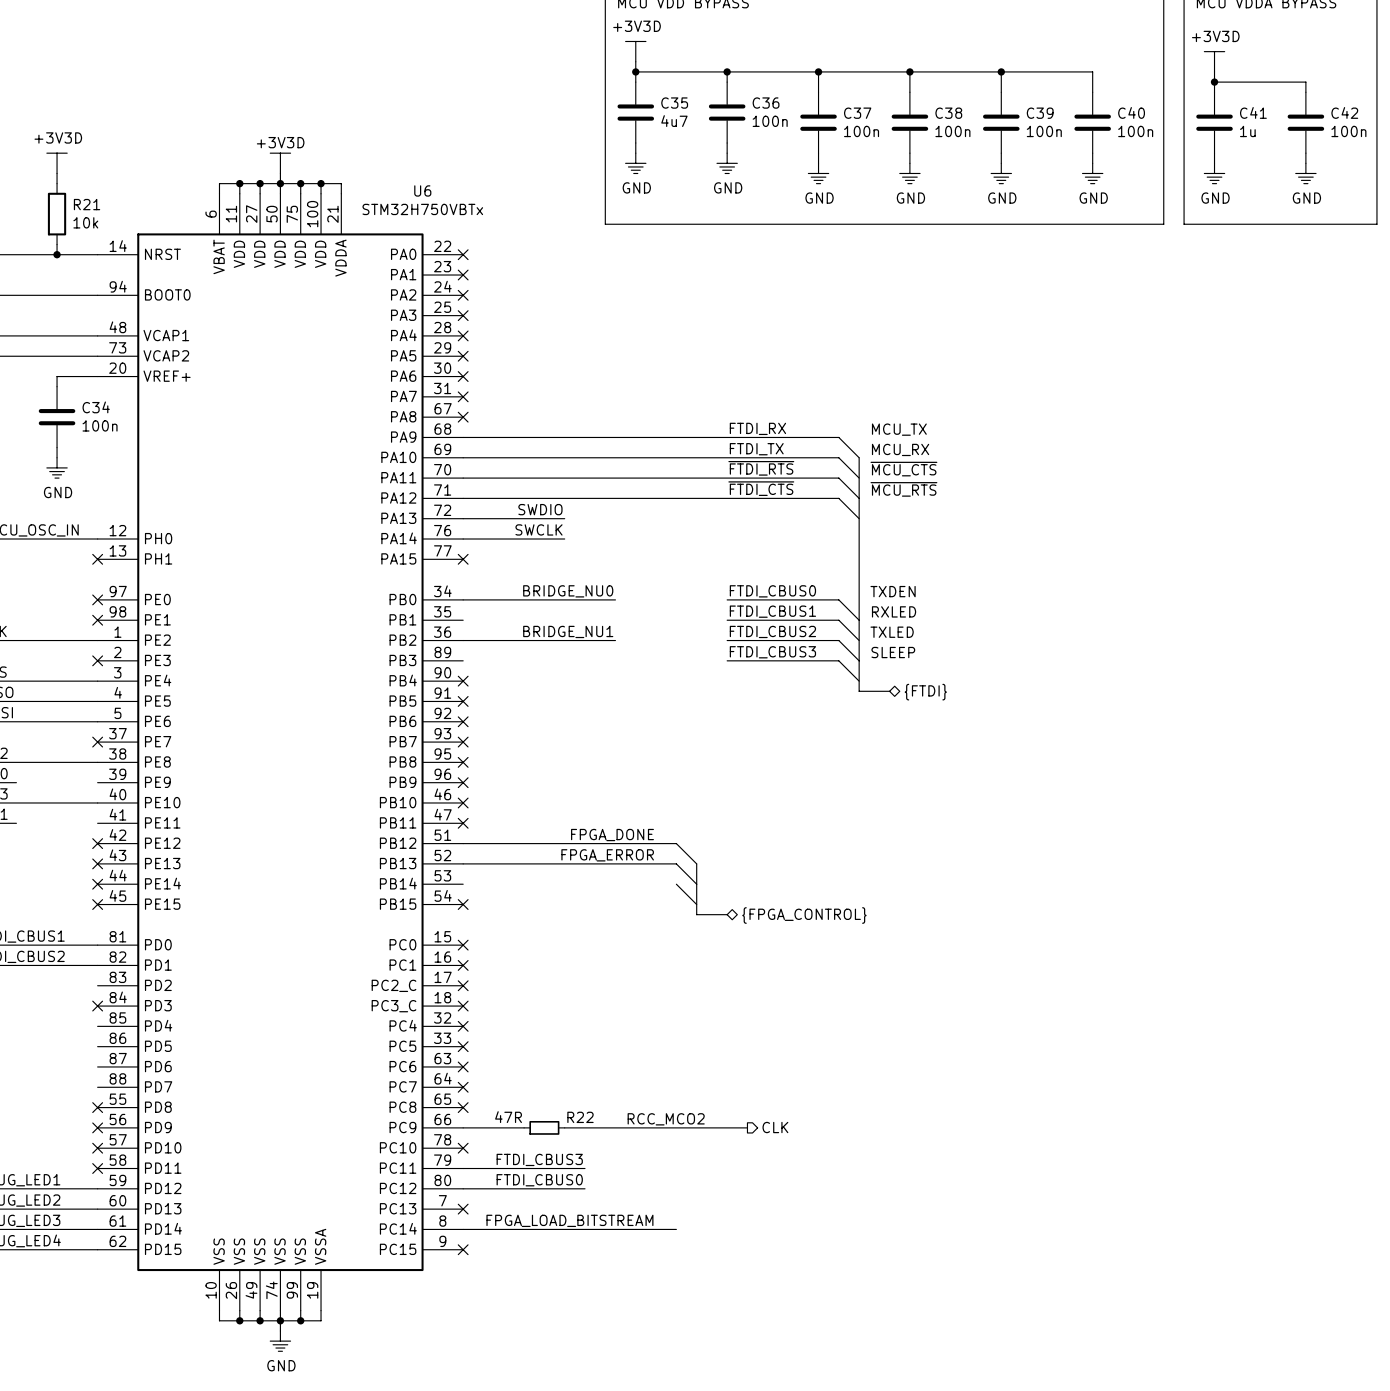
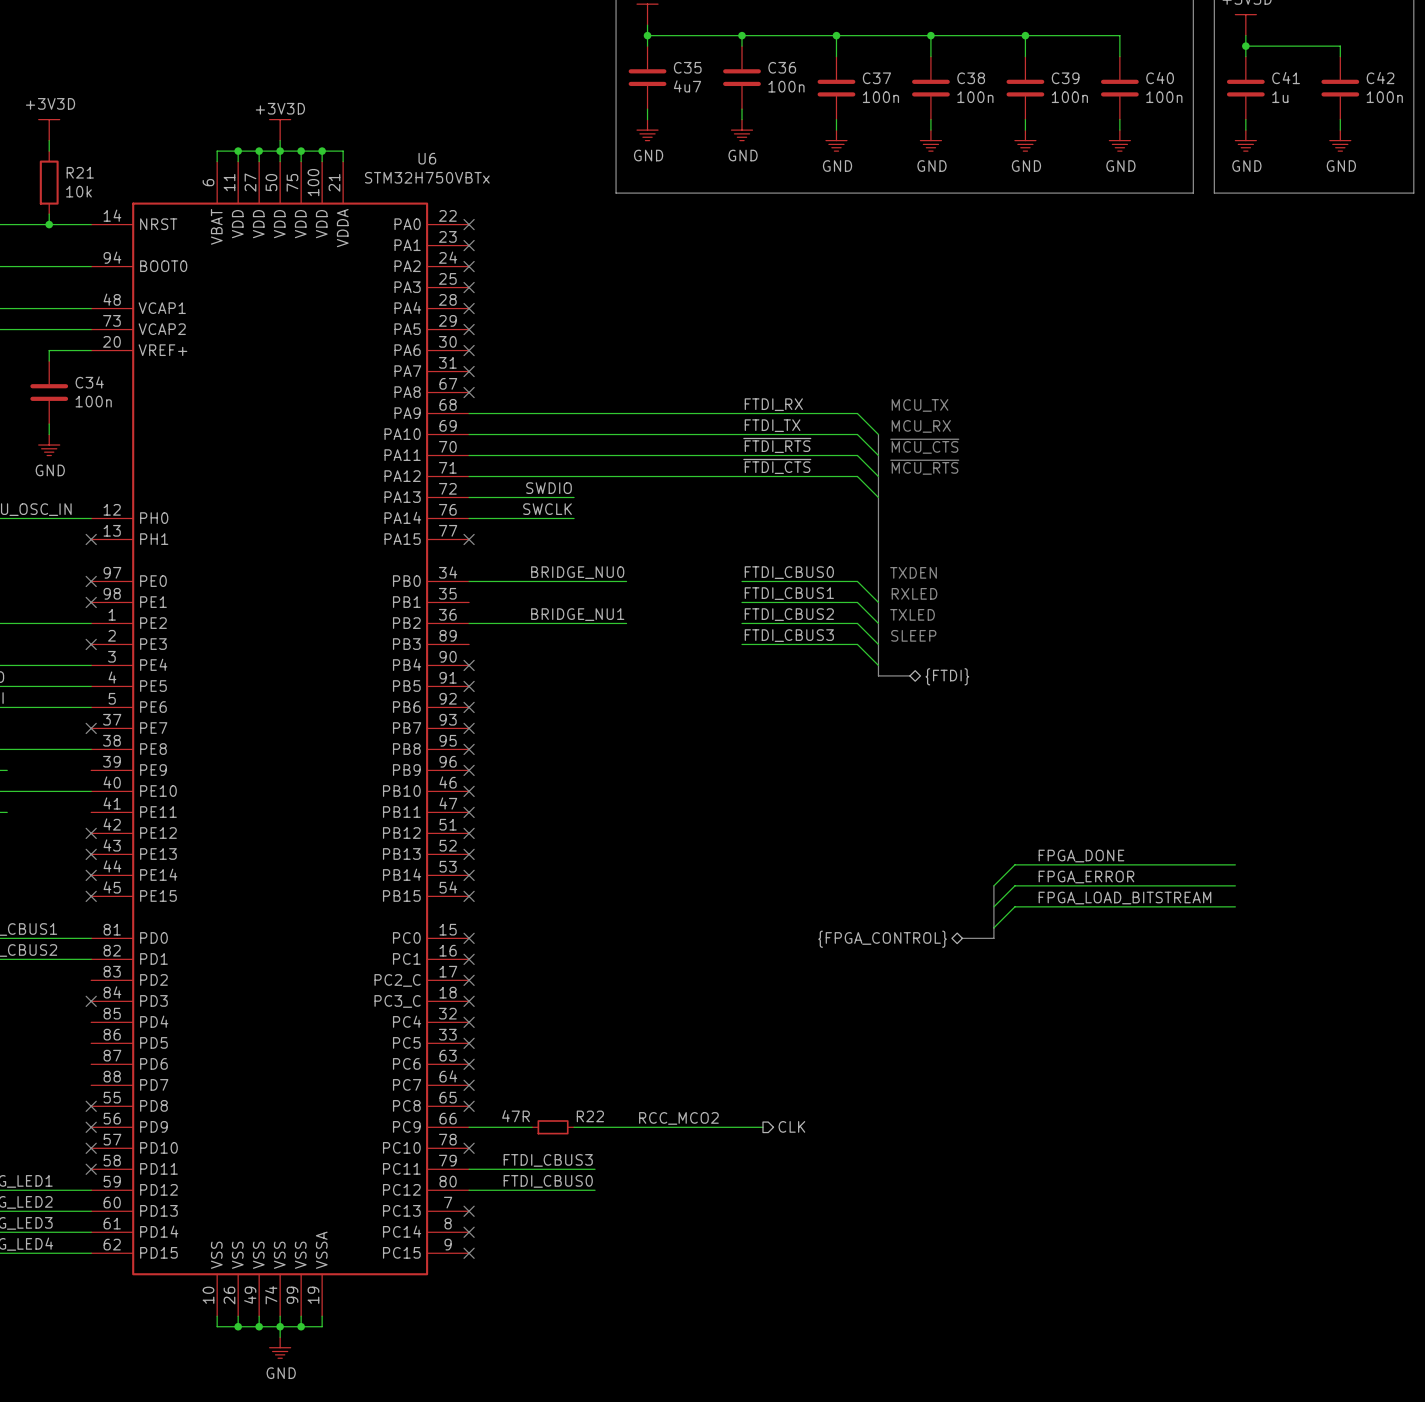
label: FPGA_DONE (612, 835) -> none
wire: (463, 843) (676, 843) (696, 863) -> none
no-connect mark: none -> (469, 833)
label: FPGA_ERROR (607, 855) -> none
wire: (463, 863) (676, 863) (696, 884) -> none
no-connect mark: none -> (469, 854)
bus: (696, 863) (696, 914) (727, 914) -> none
label: none -> FPGA_DONE (1081, 856)
wire: none -> (1235, 864) (1014, 864) (993, 885)
no-connect mark: none -> (469, 875)
wire: (676, 884) (696, 904) -> none
label: none -> FPGA_ERROR (1086, 877)
bus: none -> (993, 885) (993, 938) (962, 938)
wire: none -> (1235, 885) (1014, 885) (993, 906)
label: none -> FPGA_LOAD_BITSTREAM (1124, 898)
wire: none -> (1235, 906) (1014, 906) (993, 927)
hierarchical label rotation: 0° (804, 915) -> 180° (882, 939)
label: FPGA_LOAD_BITSTREAM (569, 1220) -> none
wire: (463, 1229) (676, 1229) -> none
no-connect mark: none -> (469, 1232)

